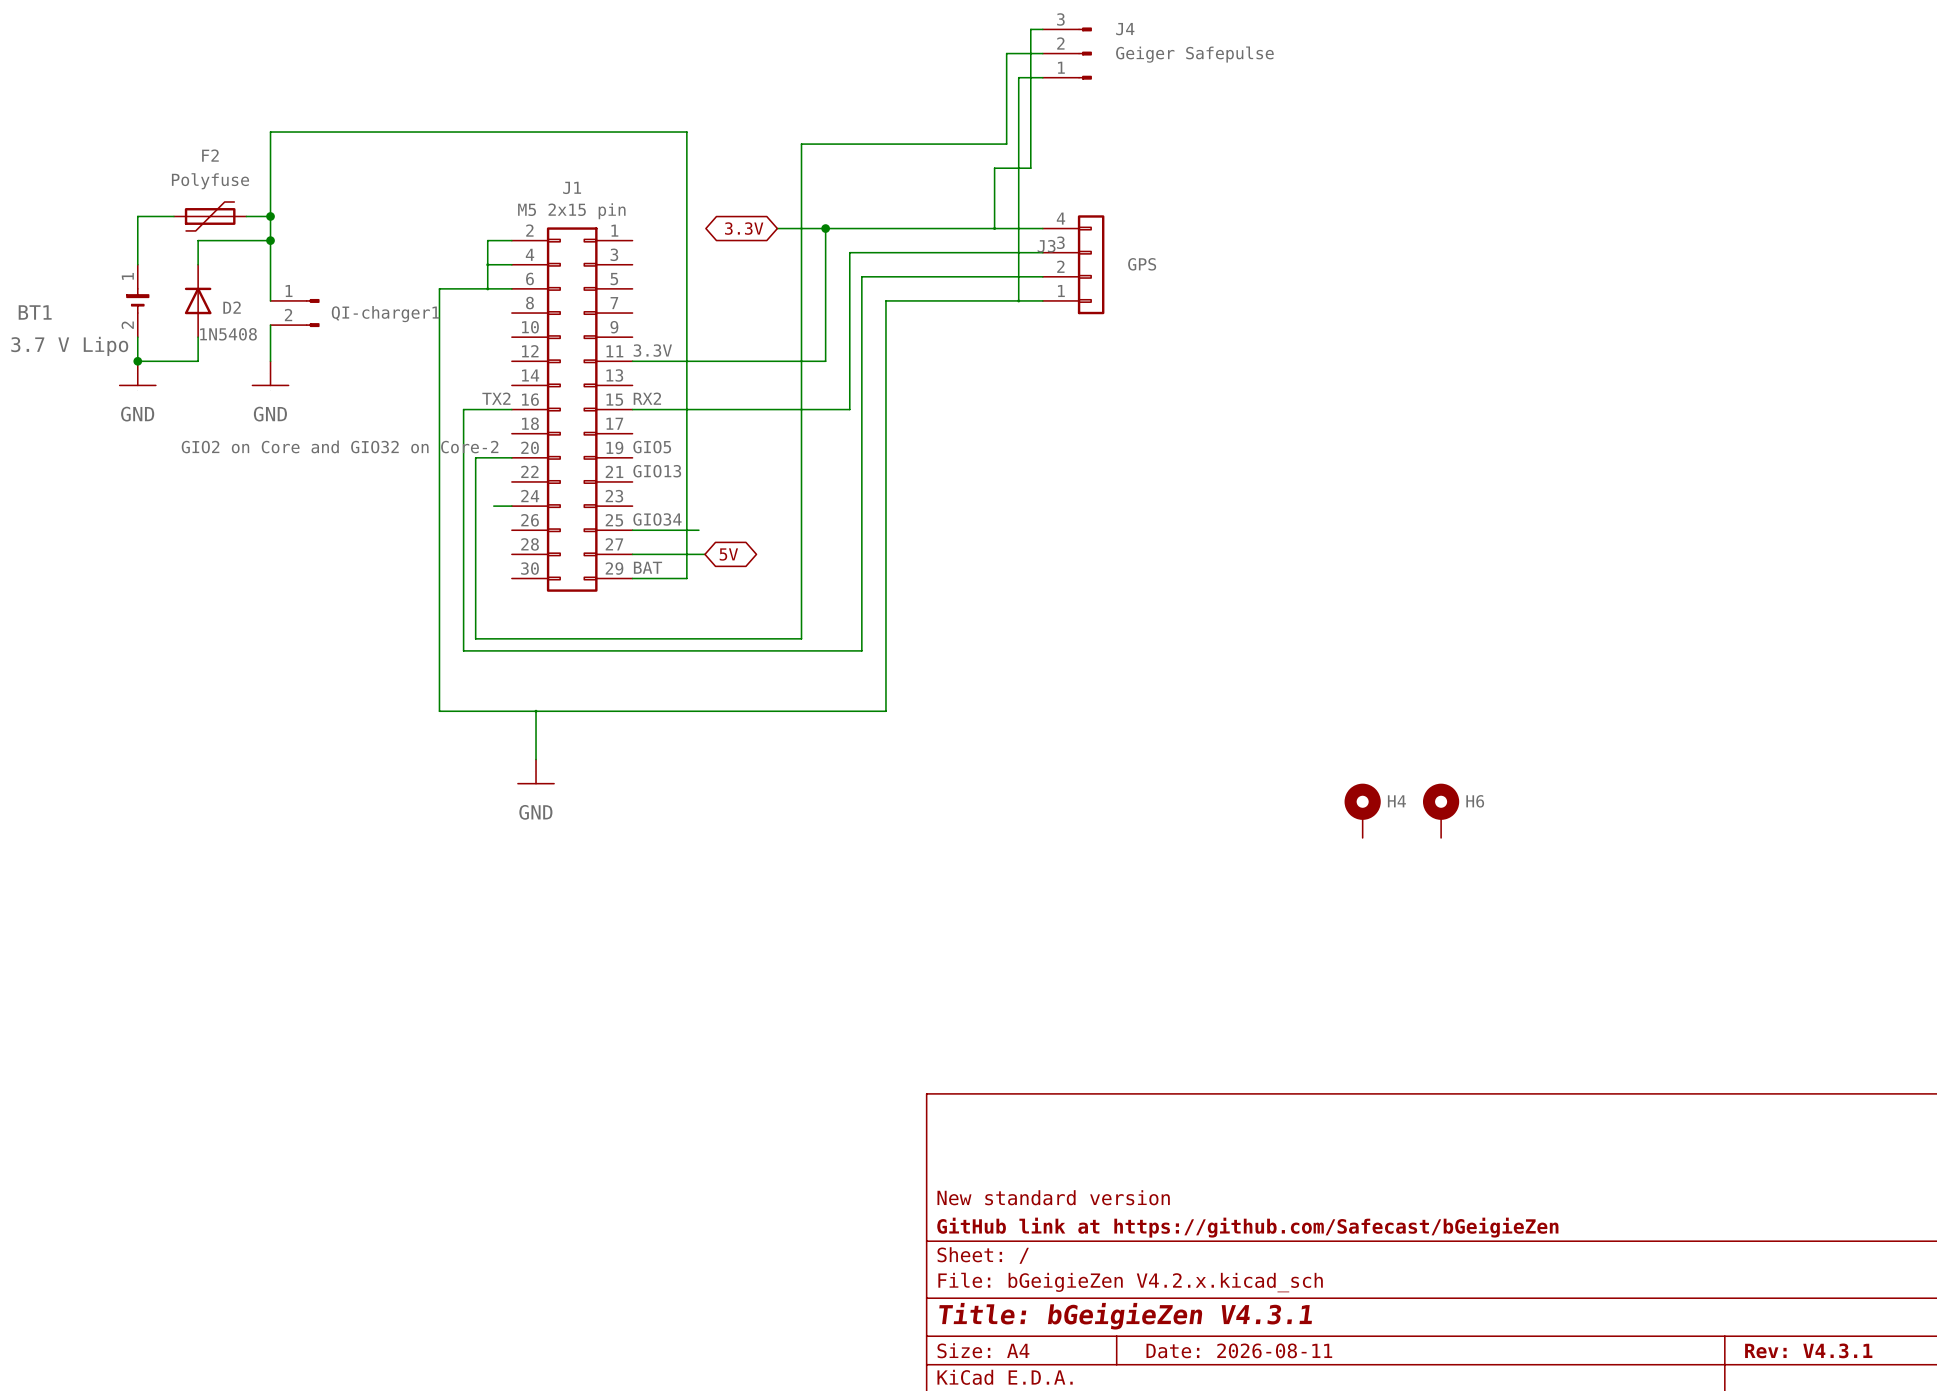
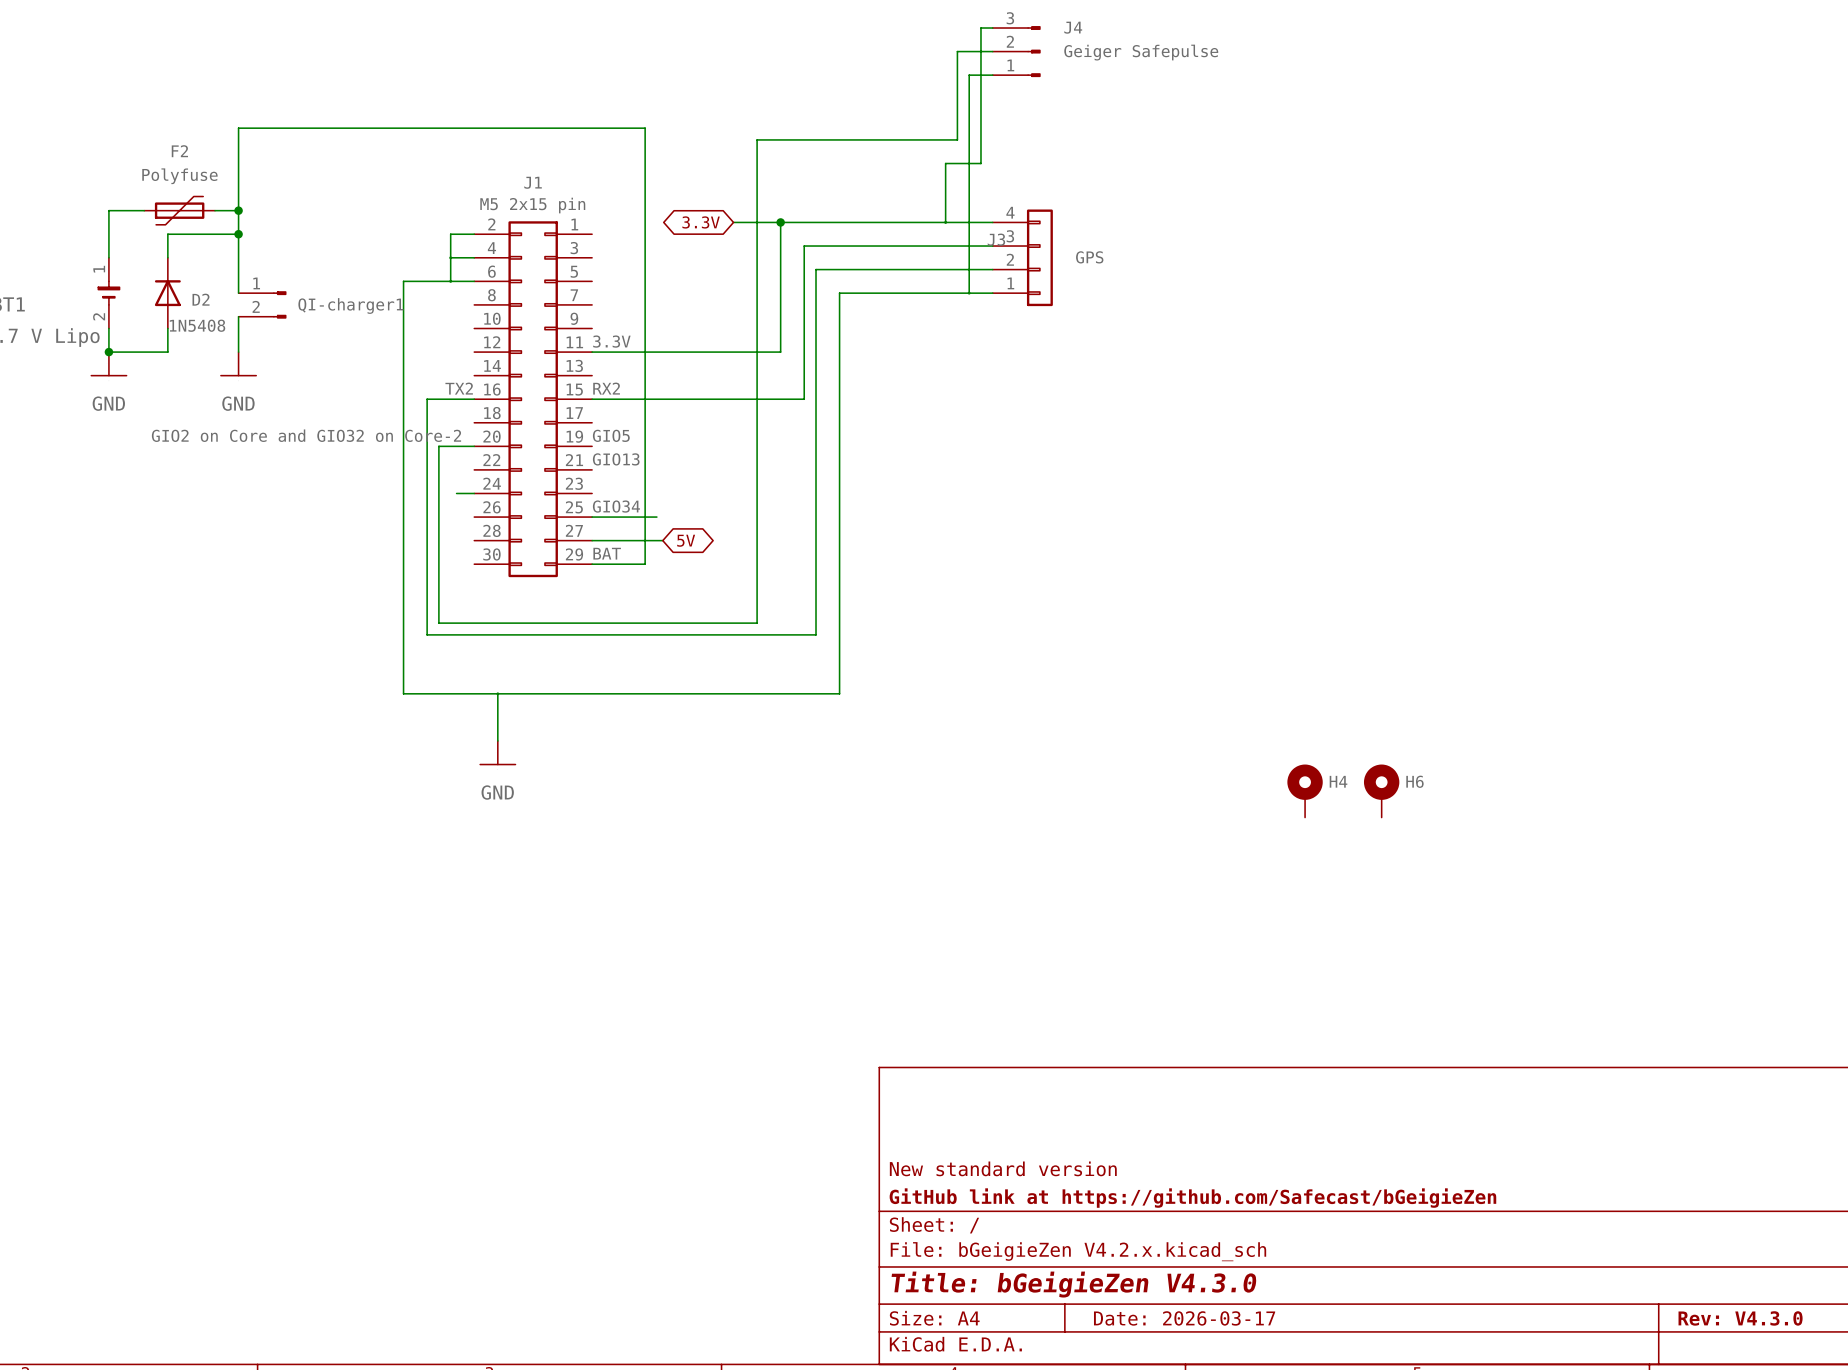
title block: Title: bGeigieZen V4.3.1 (1125, 1316) -> Title: bGeigieZen V4.3.0 (1074, 1284)
title block: Date: 2026-08-11 (1239, 1350) -> Date: 2026-03-17 (1184, 1318)
title block: Rev: V4.3.1 (1808, 1350) -> Rev: V4.3.0 (1740, 1318)

